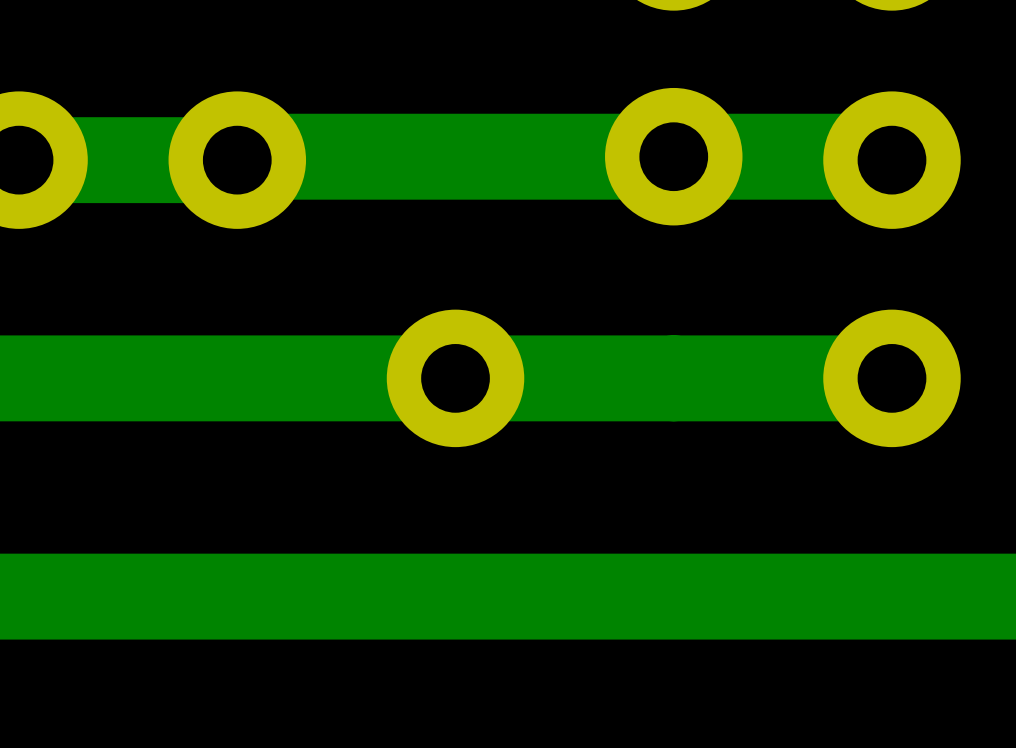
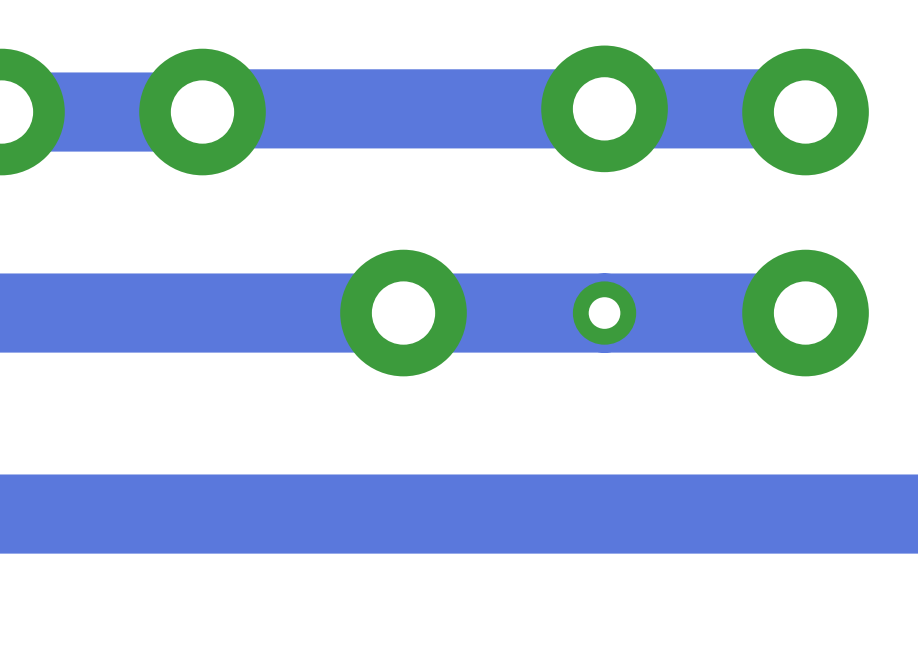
via: none -> (604, 313)

